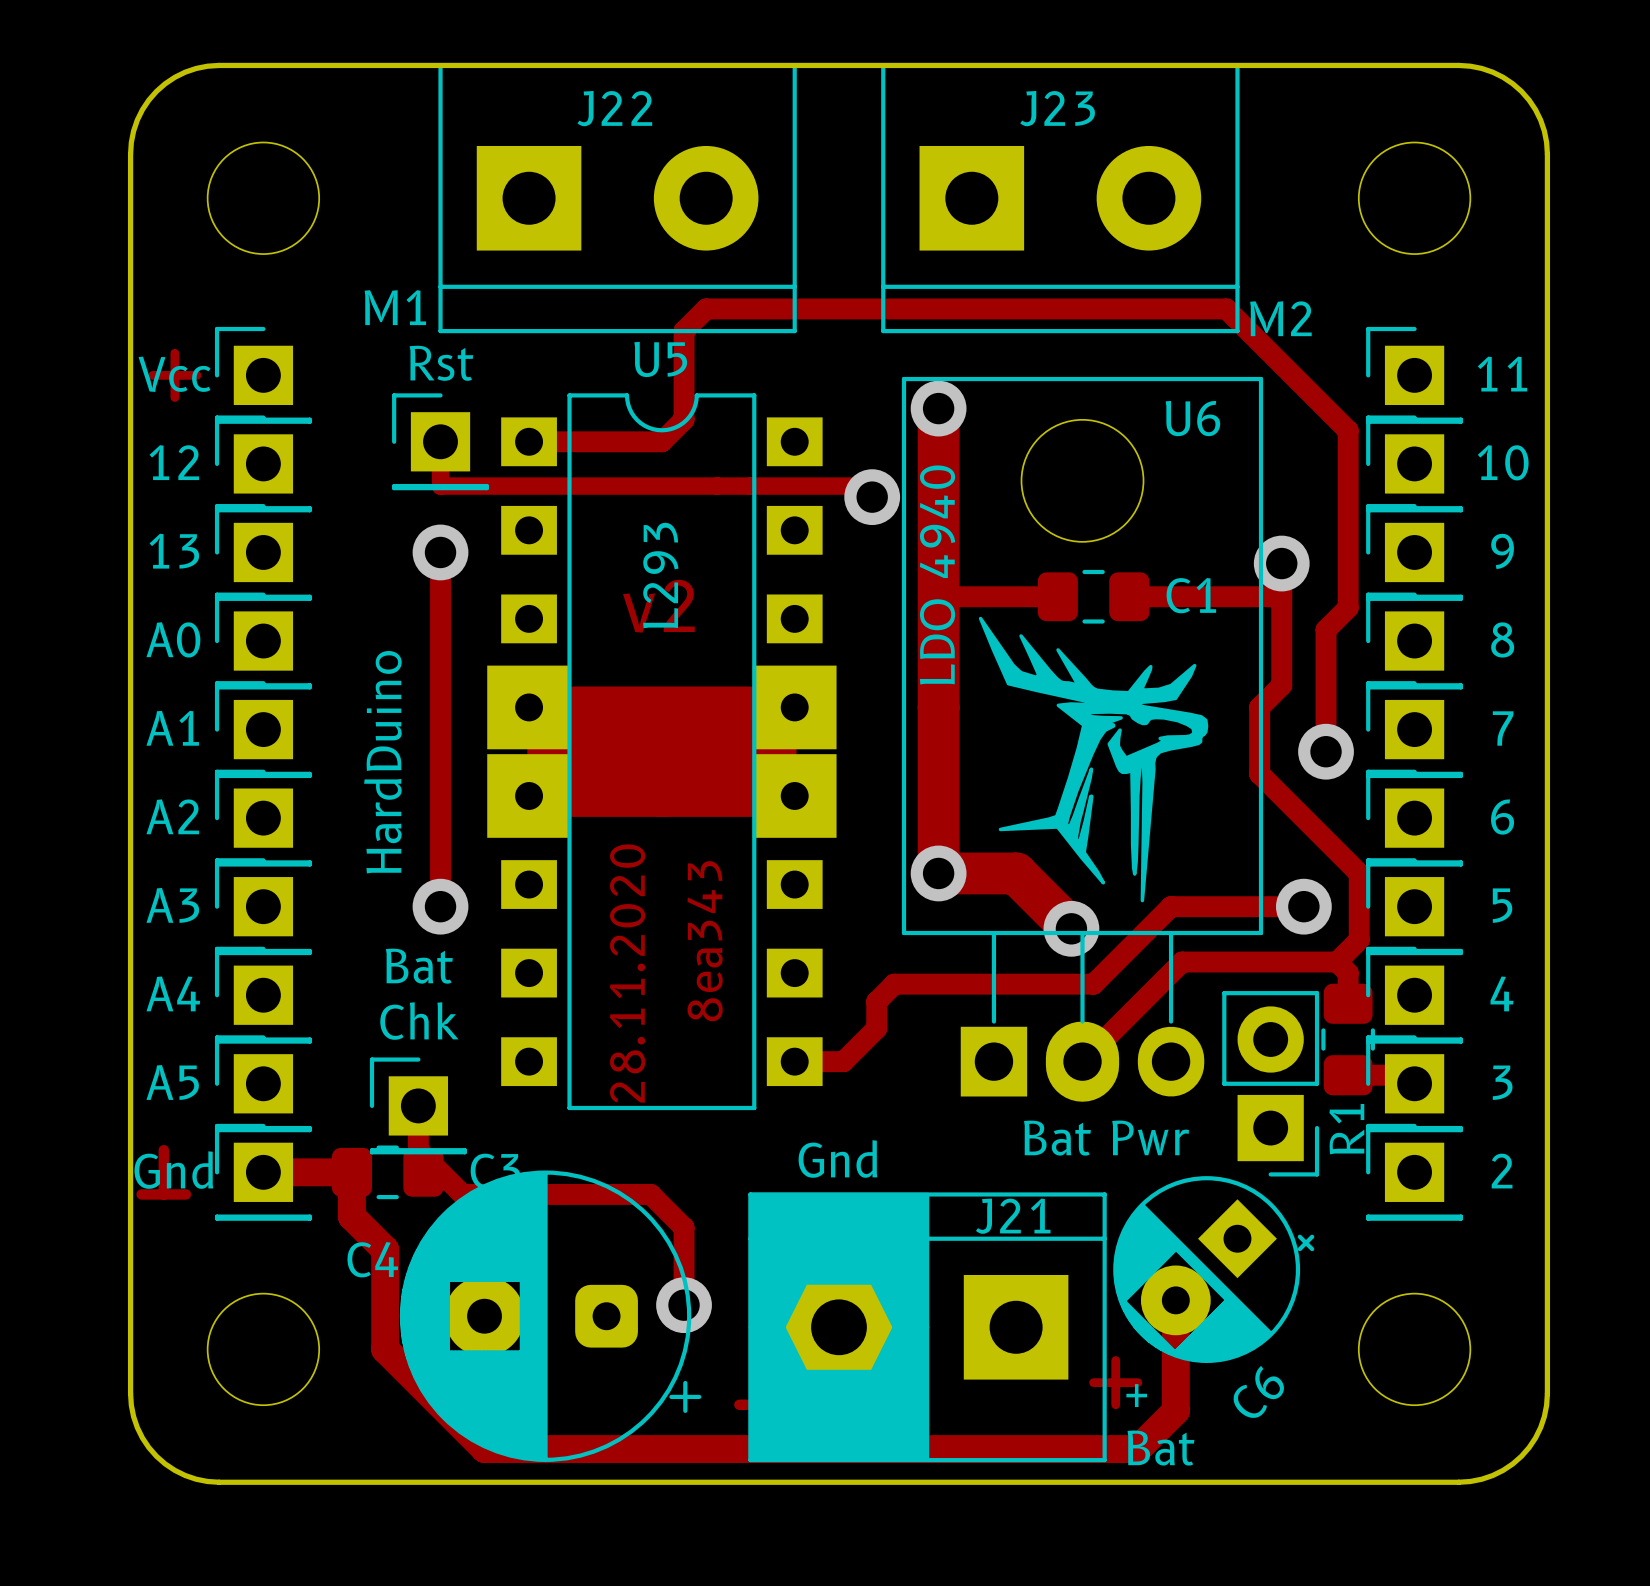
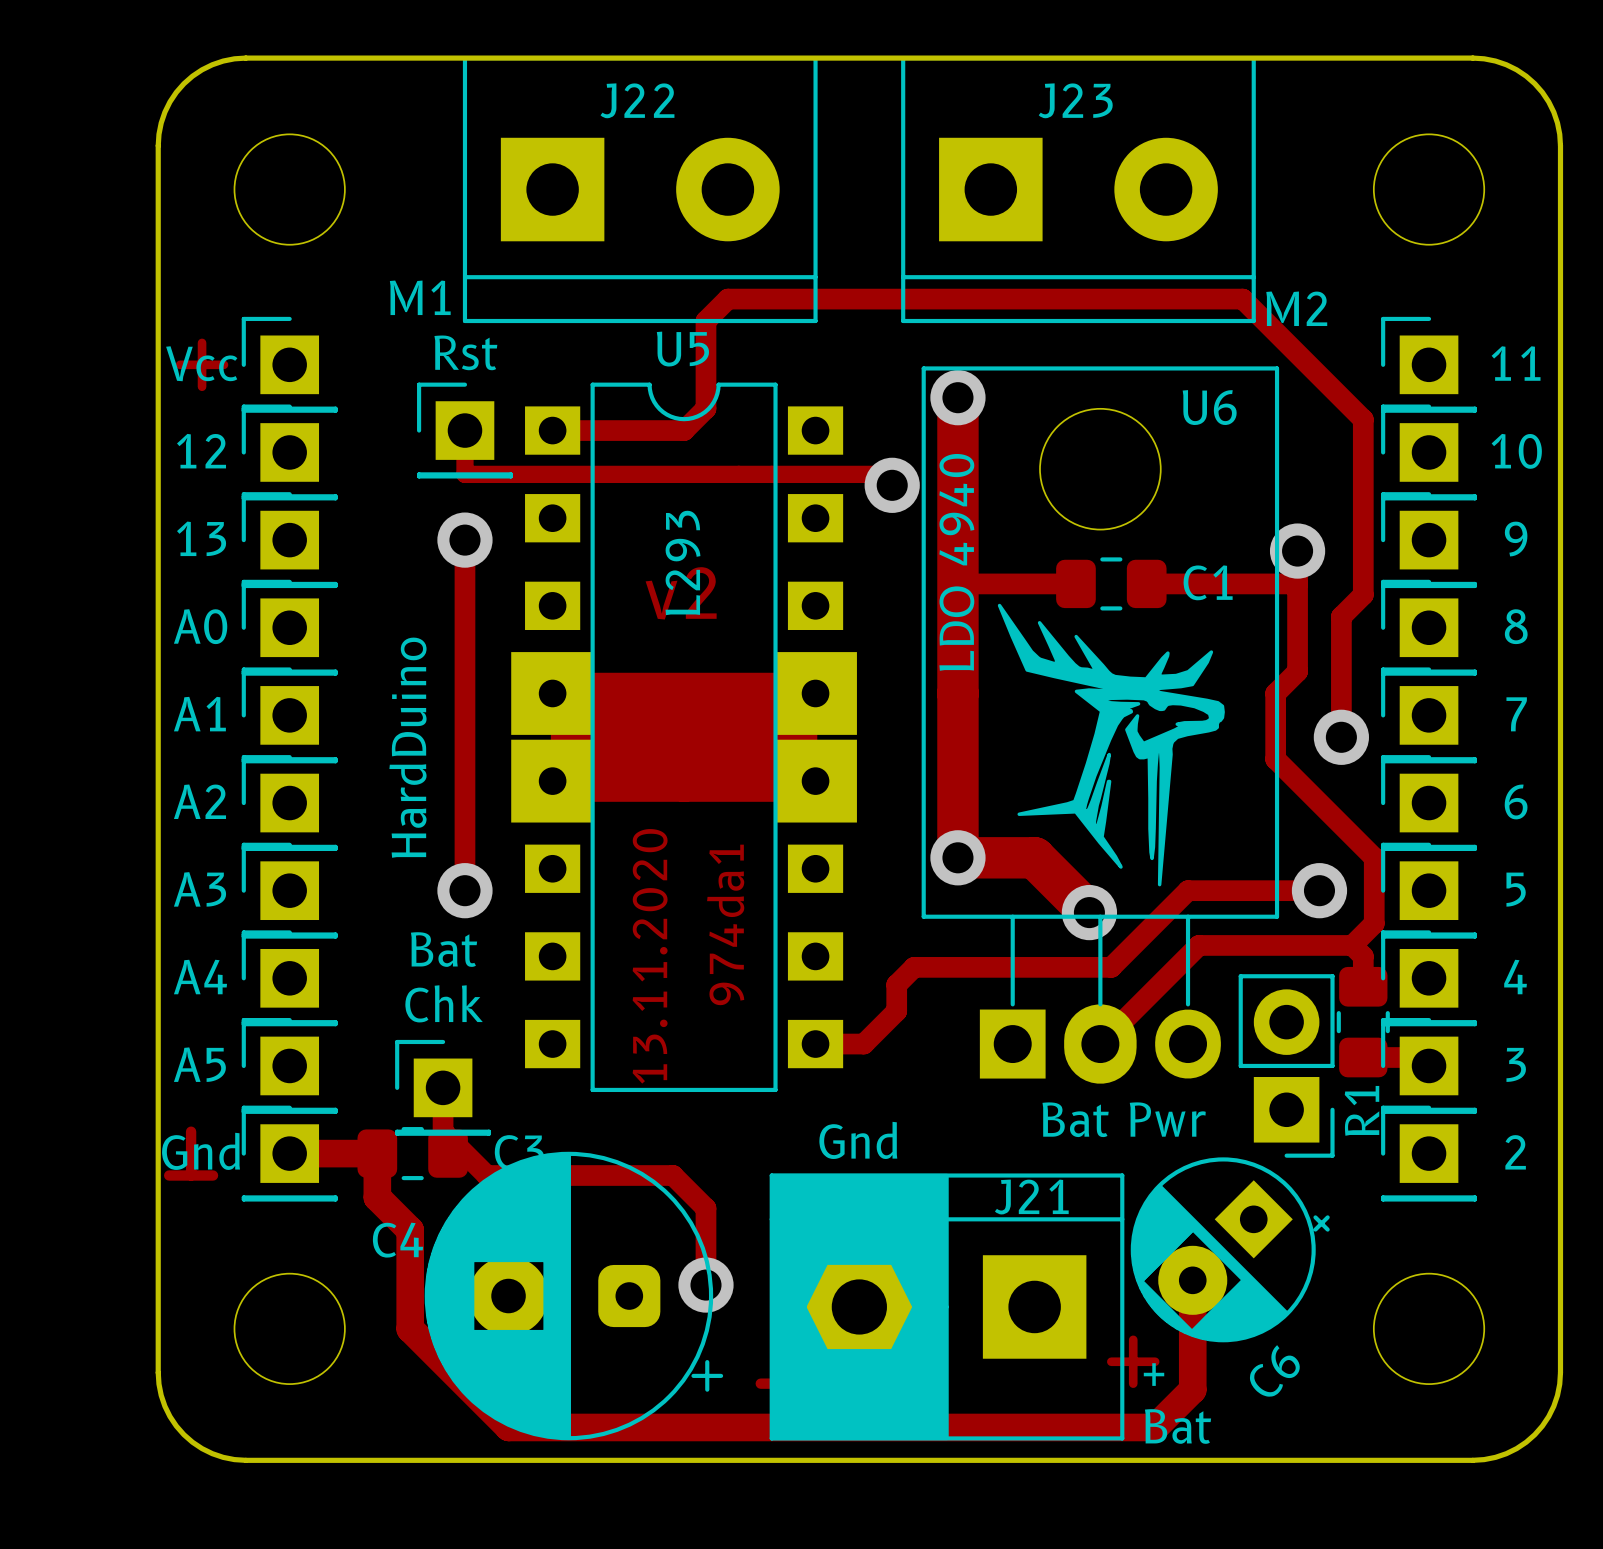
text: 8ea343 (705, 941) -> 974da1 (725, 924)
text: 28.11.2020 (627, 973) -> 13.11.2020 (650, 956)

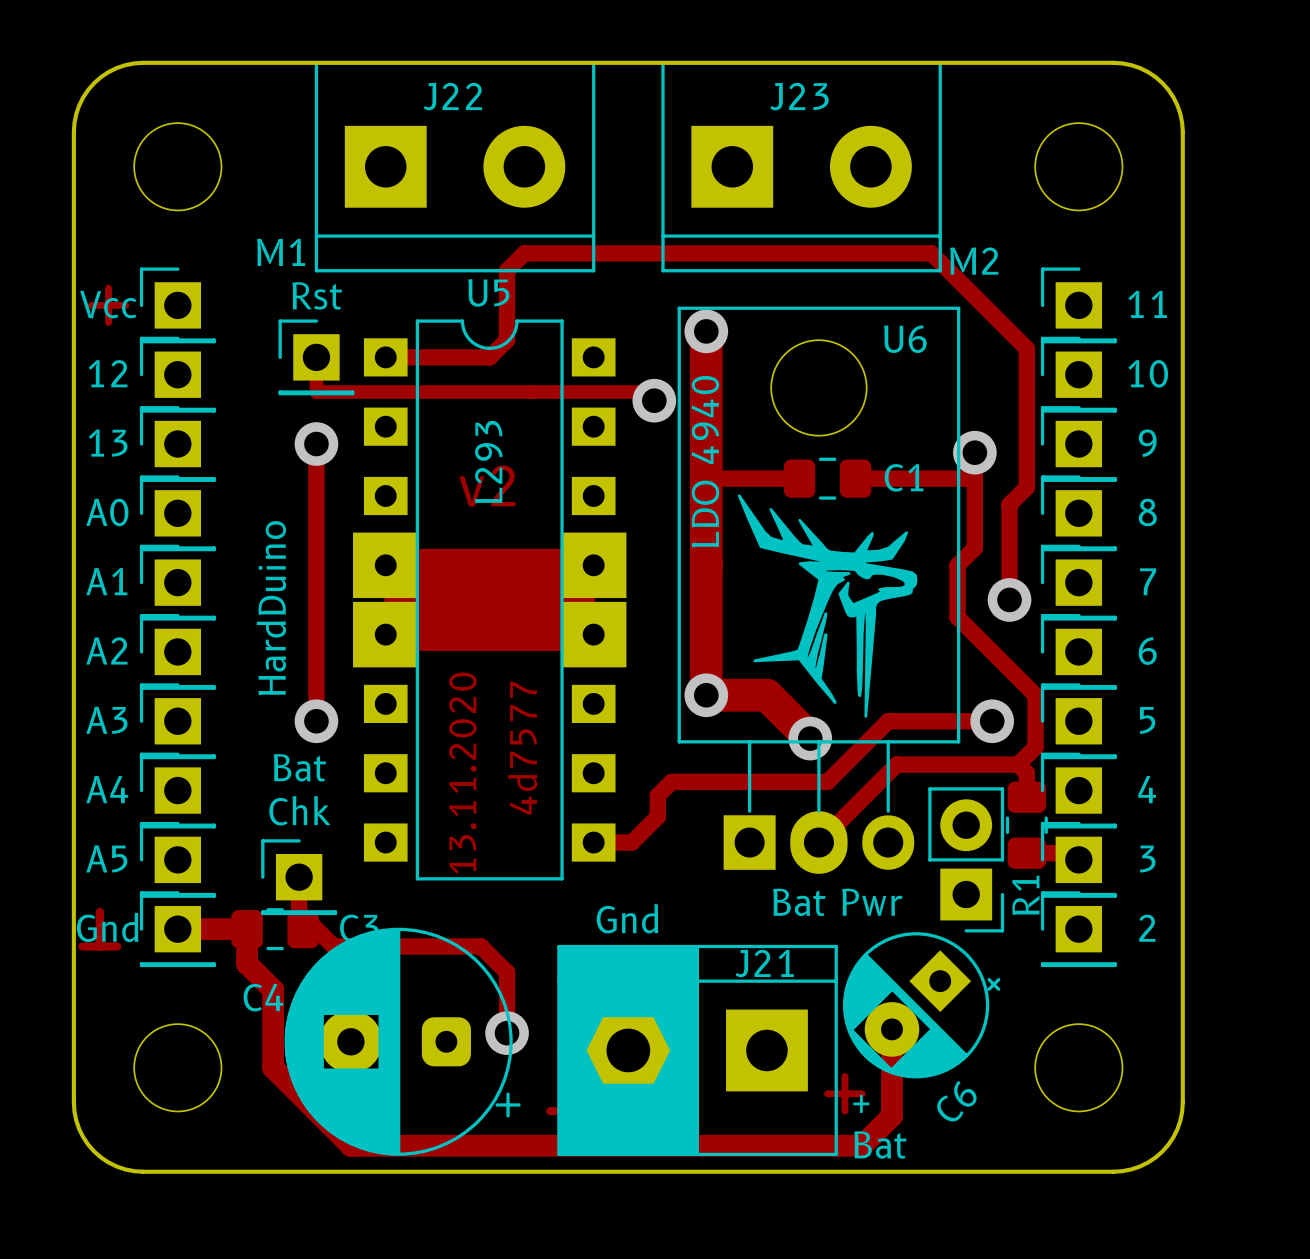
text: 974da1 (725, 924) -> 4d7577 (522, 748)

